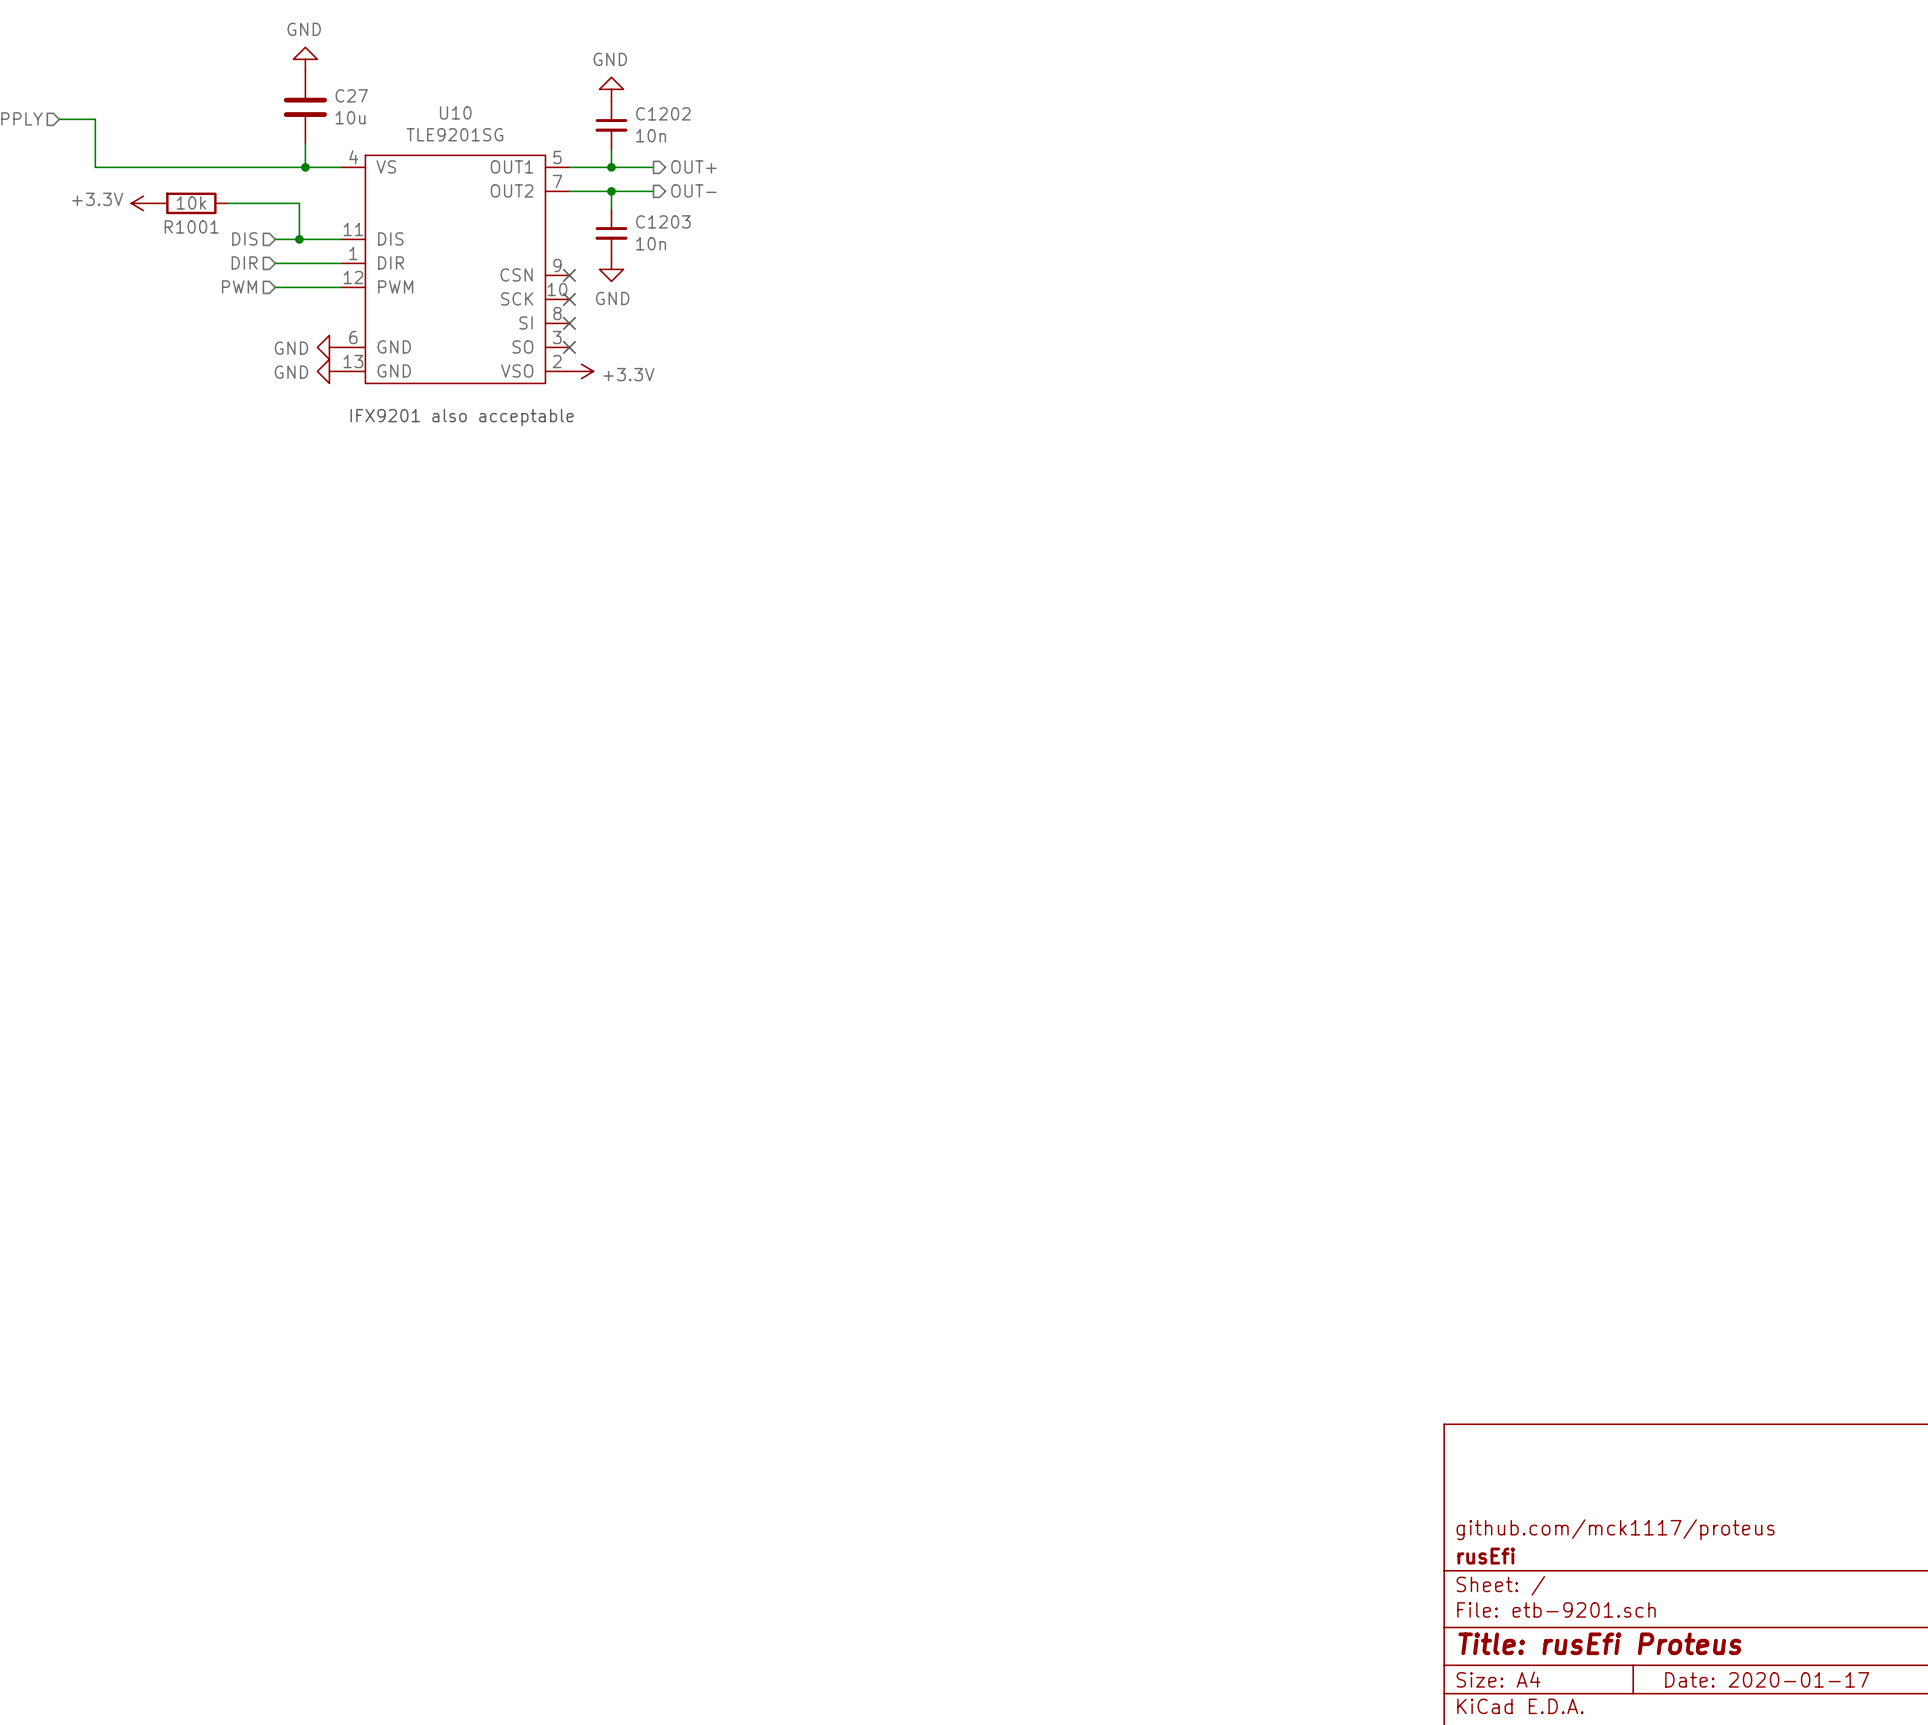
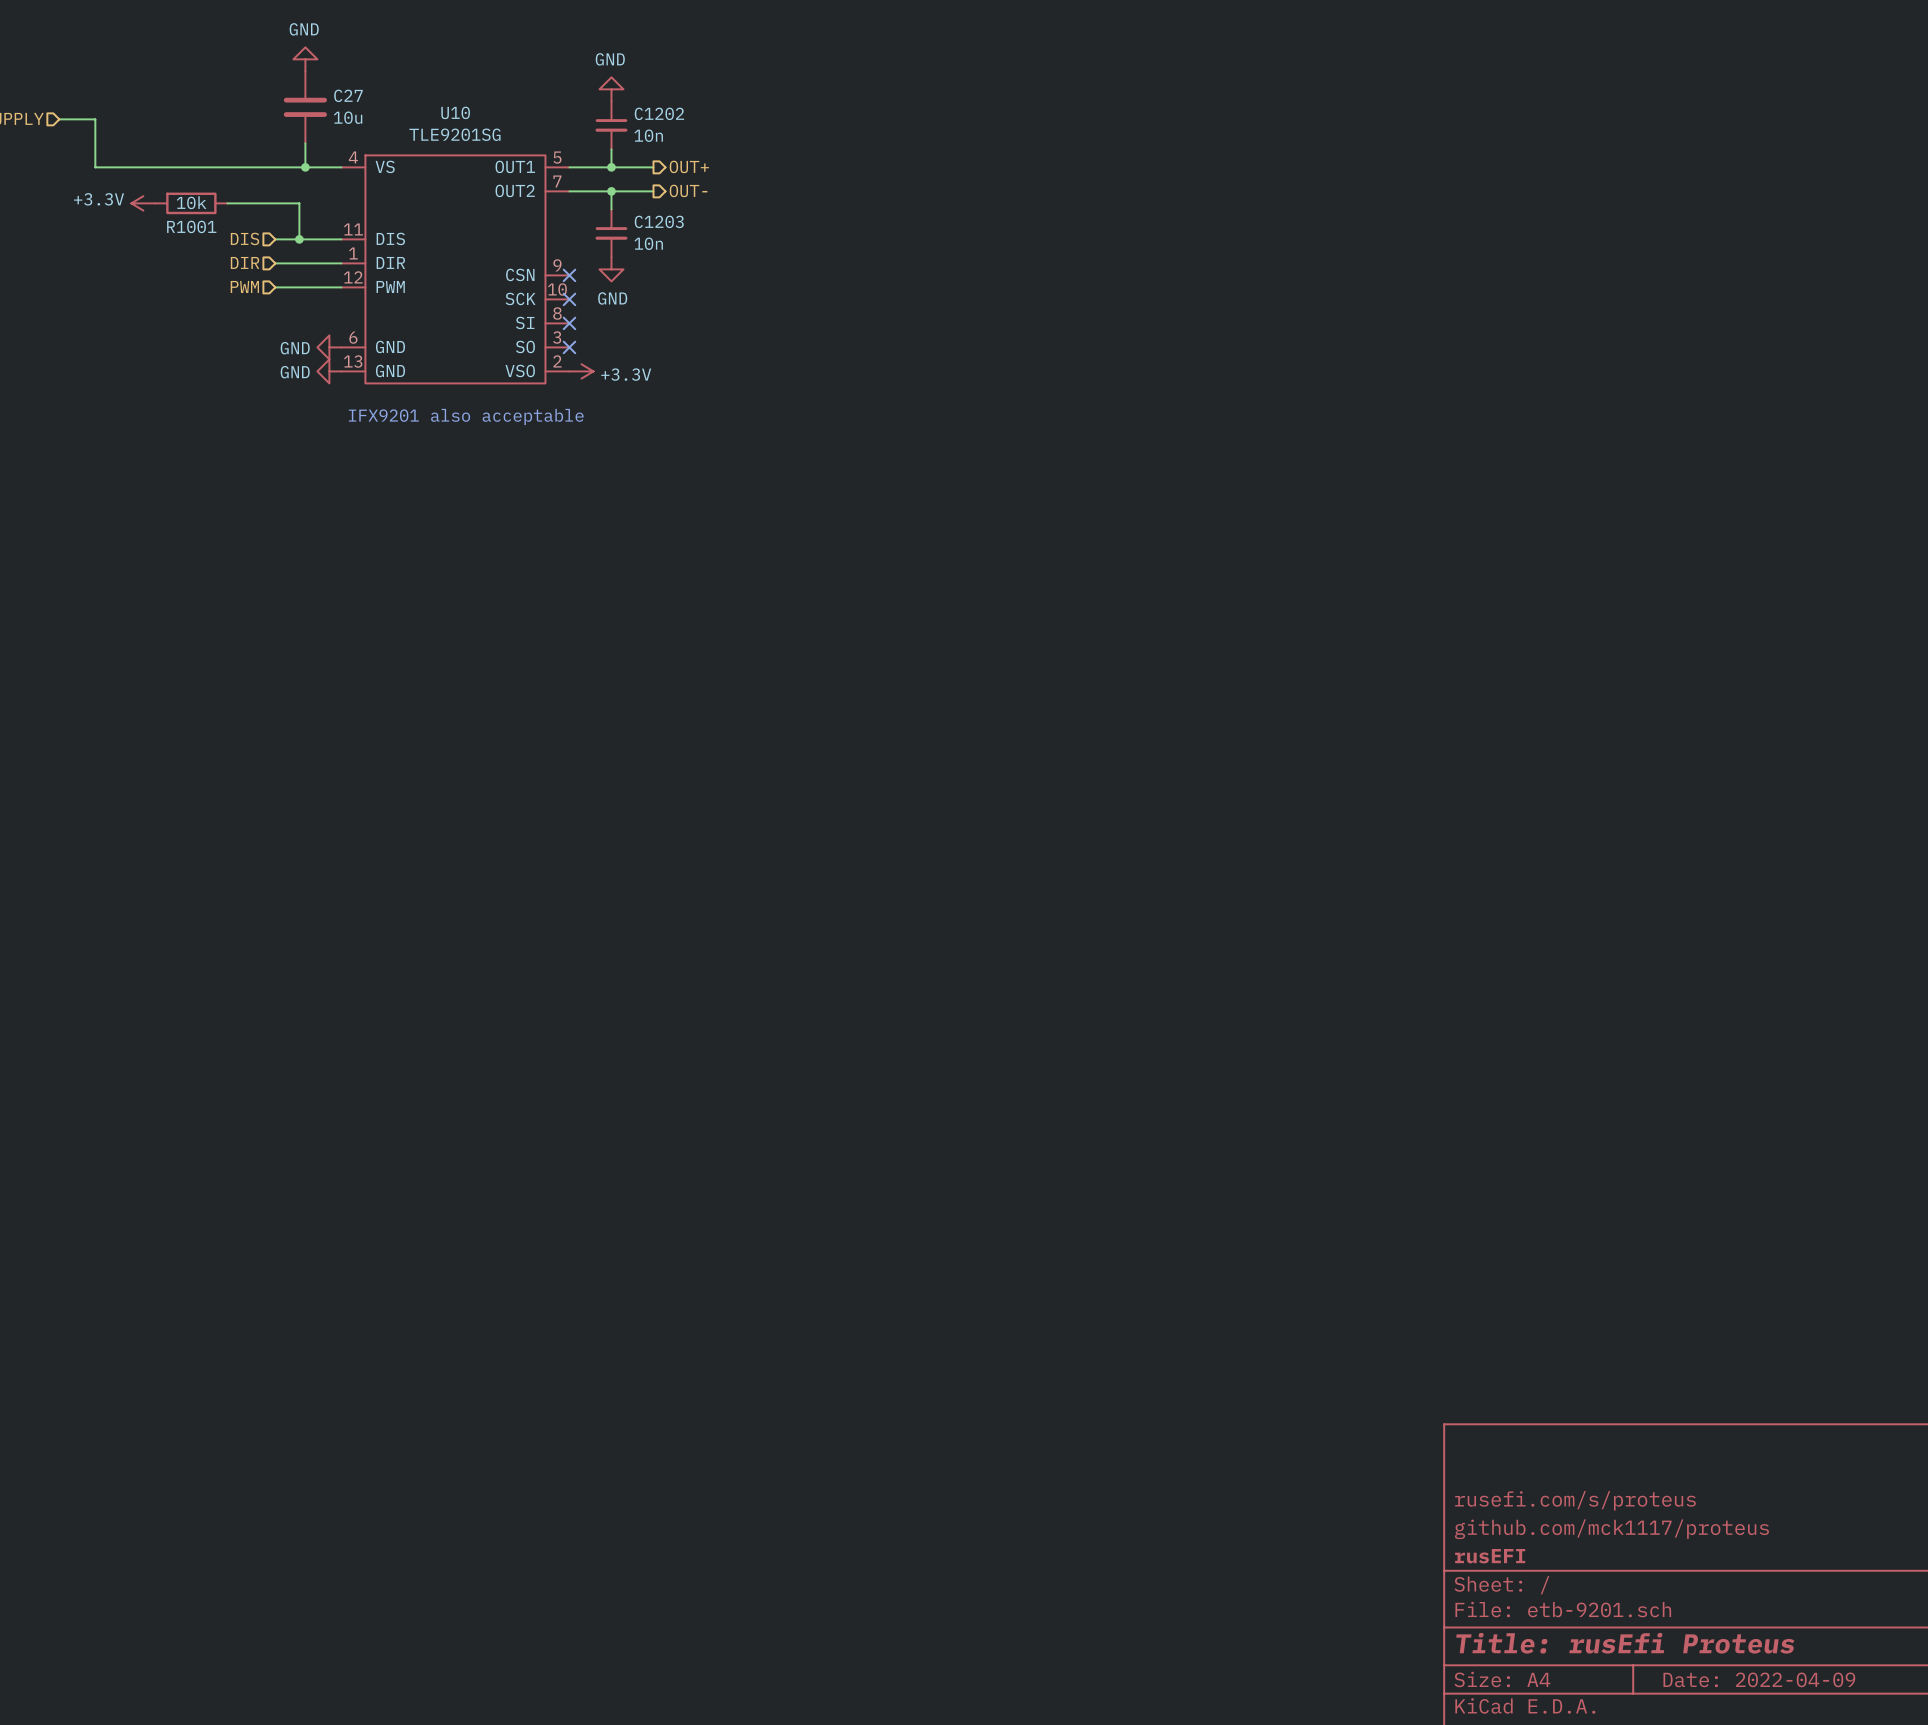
title block: none -> rusefi.com/s/proteus (1575, 1500)
title block: rusEfi (1486, 1556) -> rusEFI (1490, 1556)
title block: Date: 2020-01-17 (1767, 1679) -> Date: 2022-04-09 (1759, 1679)

